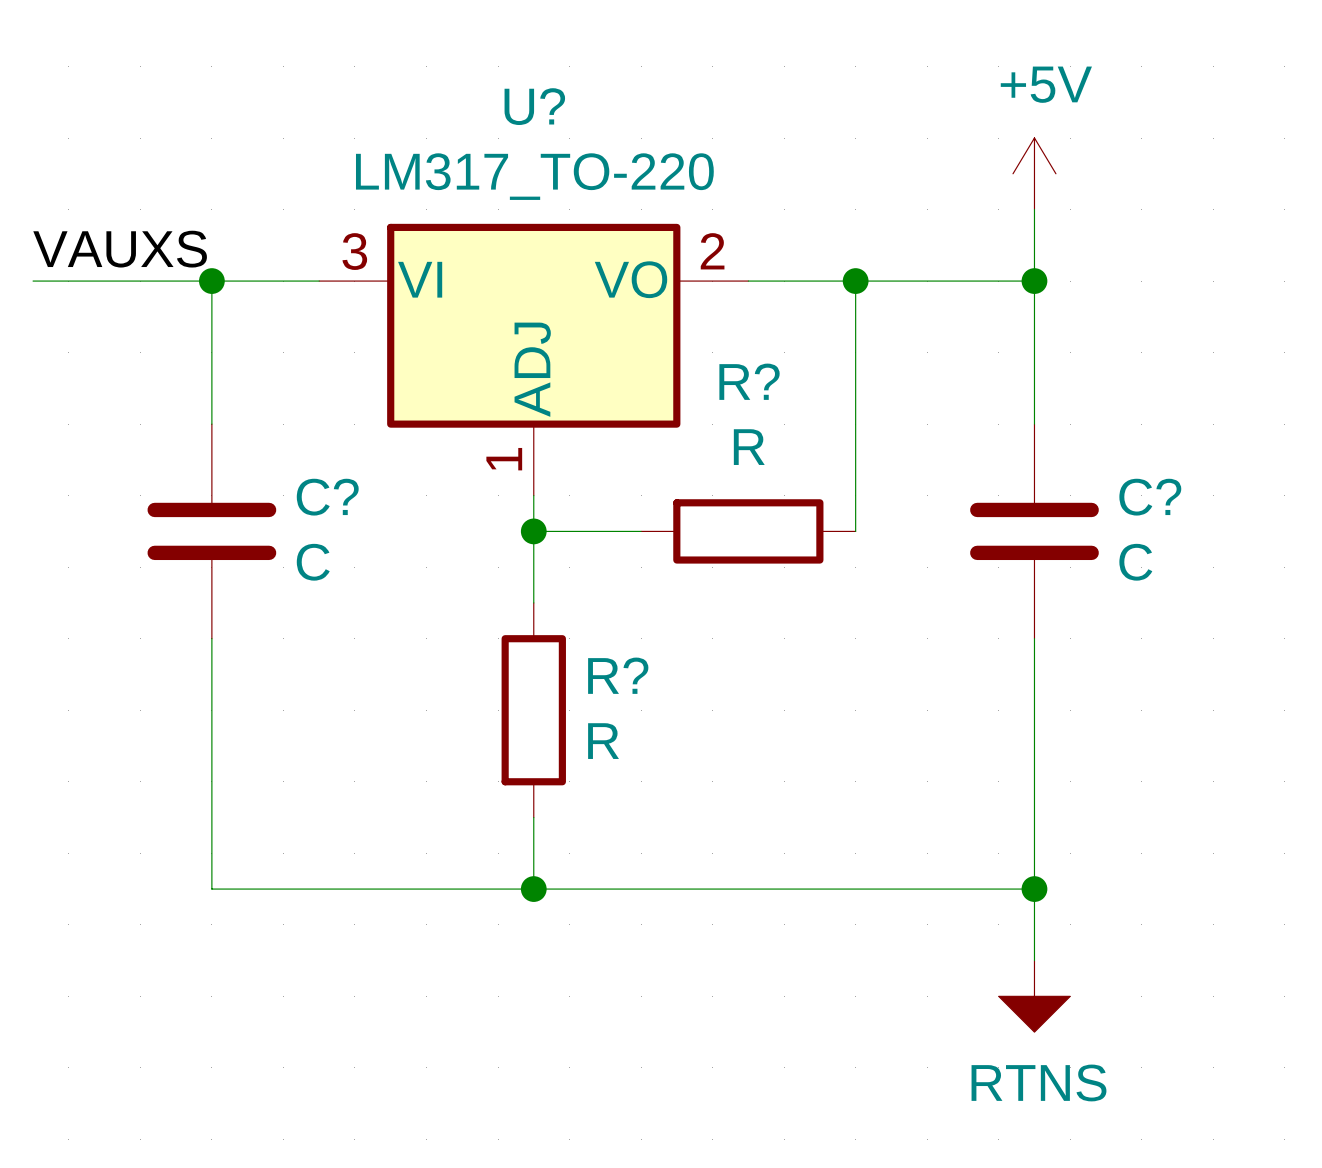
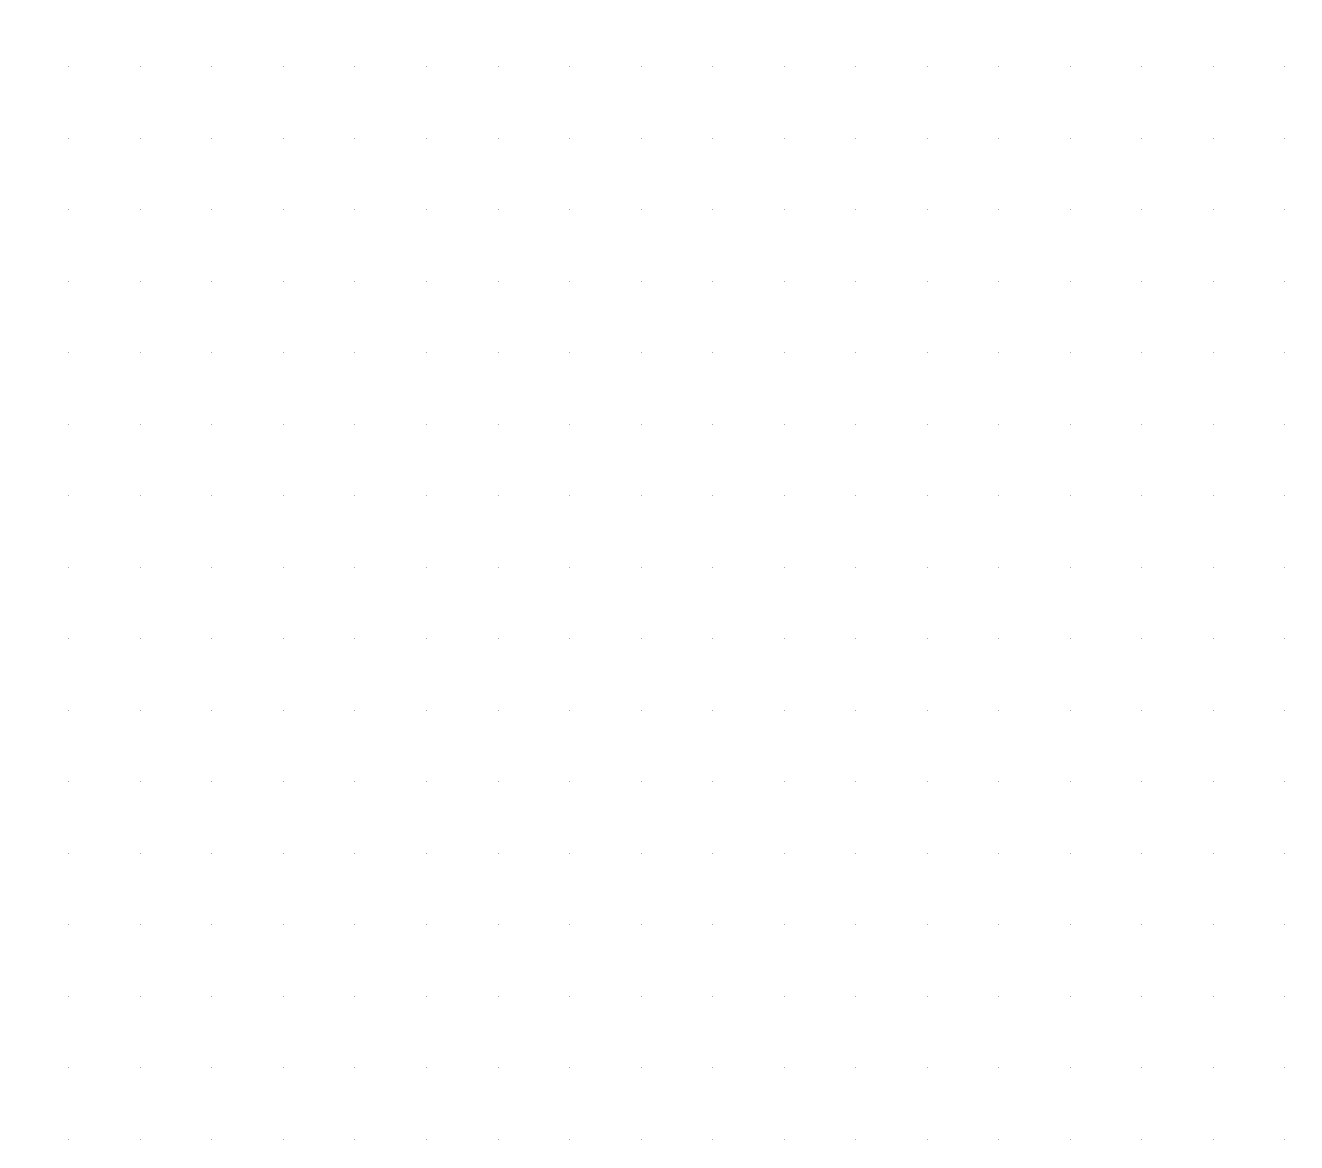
power symbol: +5V (1034, 173) -> none
wire: (1034, 209) (1034, 424) -> none
label: VAUXS (120, 249) -> none
wire: (33, 281) (319, 281) -> none
wire: (211, 281) (211, 424) -> none
junction: (211, 281) -> none
wire: (748, 281) (1034, 281) -> none
wire: (855, 281) (855, 531) -> none
junction: (855, 281) -> none
junction: (1034, 281) -> none
U?: LM317_TO-220 (533, 359) -> none
wire: (533, 495) (533, 602) -> none
C?: C (211, 531) -> none
wire: (533, 531) (641, 531) -> none
junction: (533, 531) -> none
R?: R (748, 531) -> none
C?: C (1034, 531) -> none
wire: (211, 638) (211, 889) (1034, 889) -> none
wire: (1034, 638) (1034, 960) -> none
R?: R (533, 710) -> none
wire: (533, 817) (533, 889) -> none
junction: (533, 889) -> none
junction: (1034, 889) -> none
power symbol: RTNS (1034, 996) -> none

